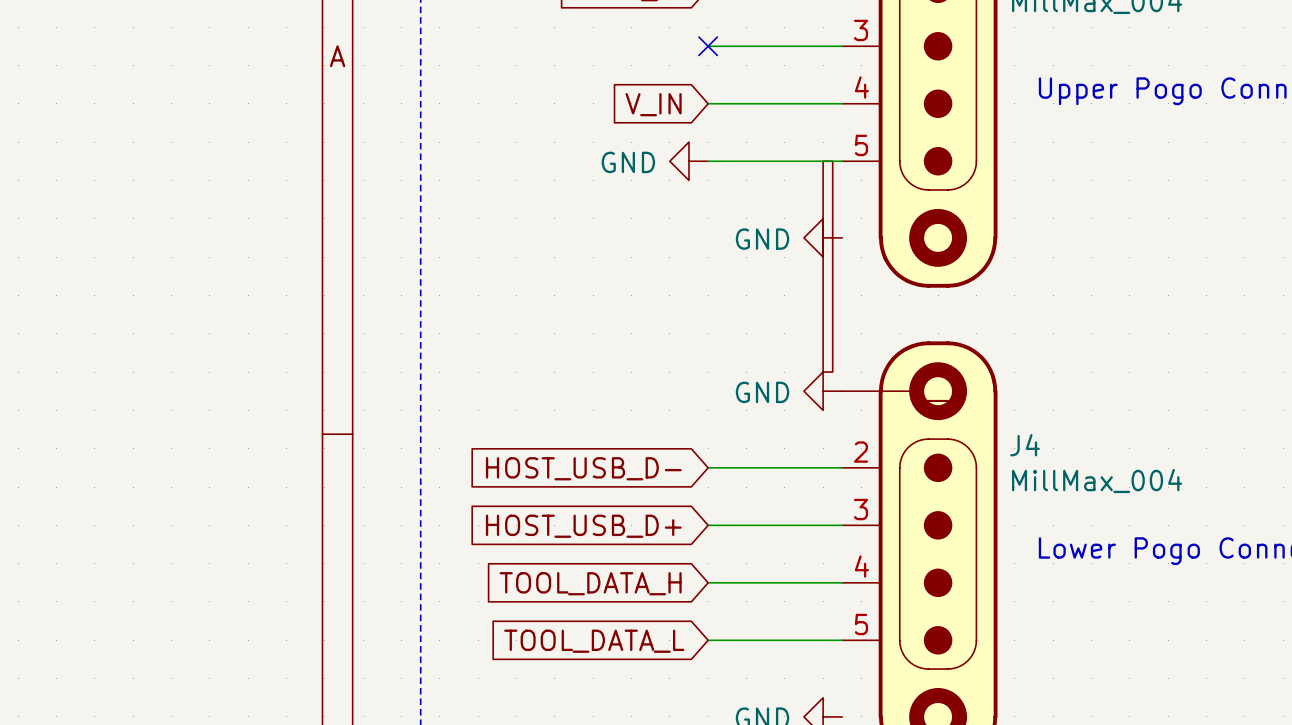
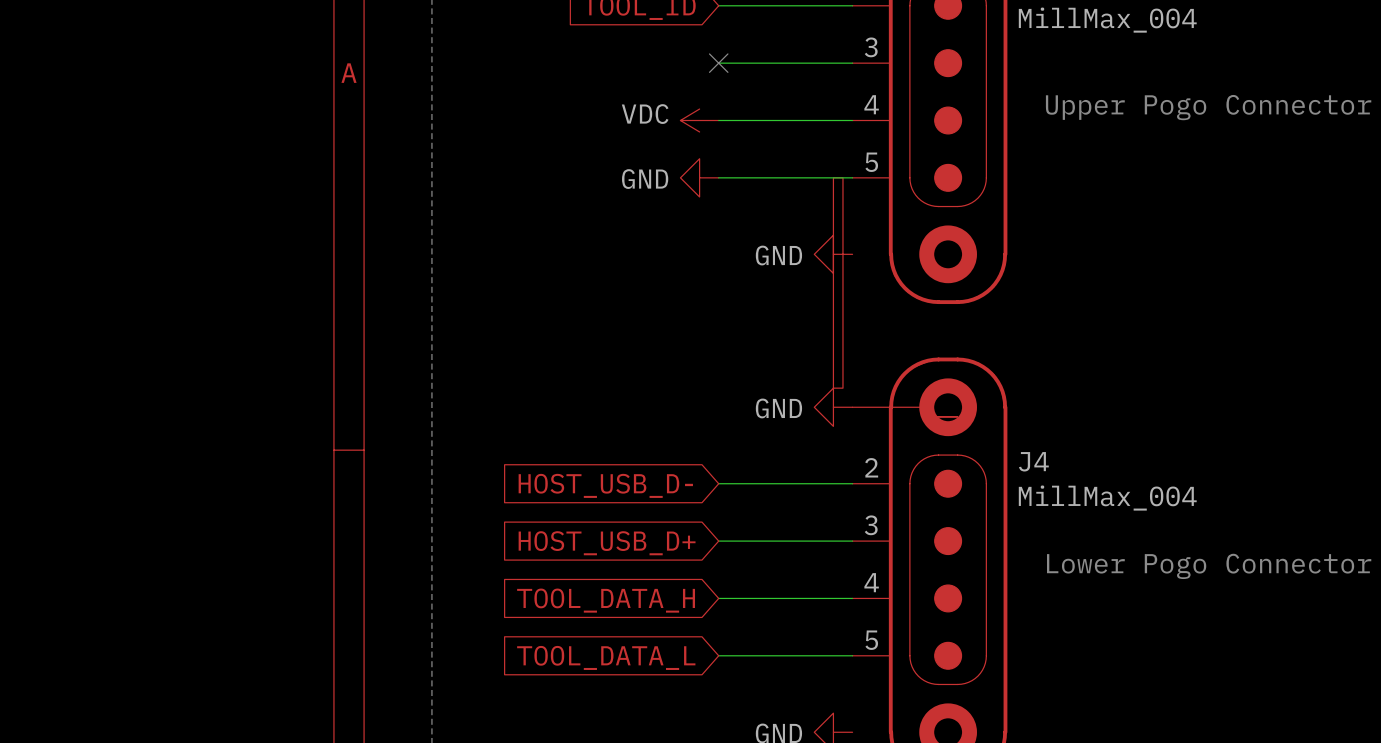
power symbol: none -> VDC (699, 120)
global label: V_IN (653, 104) -> none

